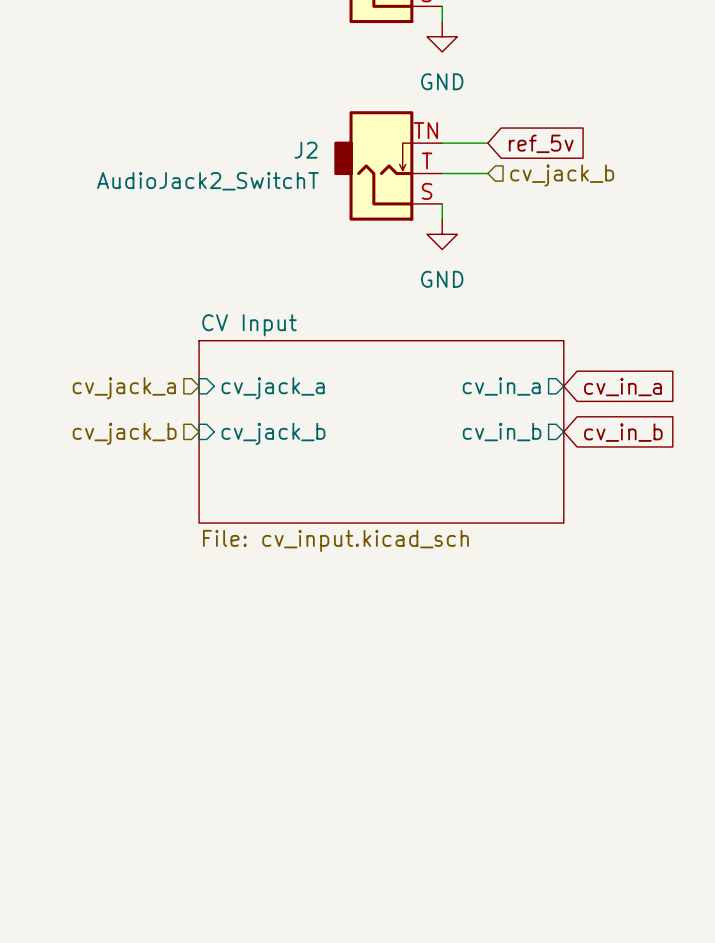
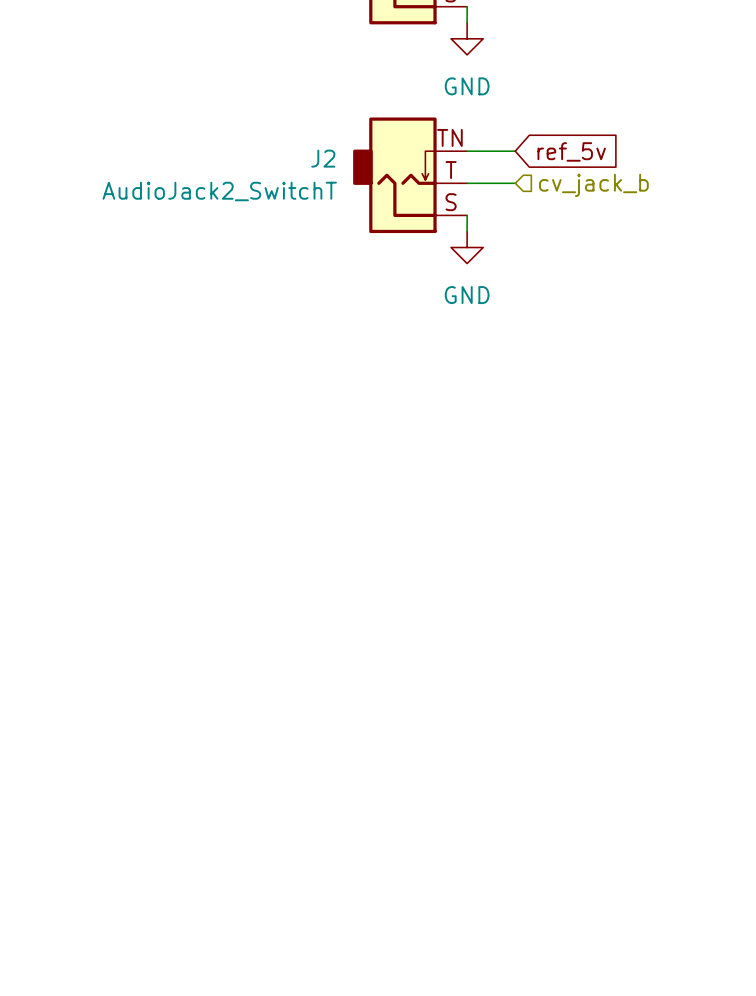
sheet pin: cv_in_a (501, 386) -> none
global label: cv_in_a (622, 387) -> none
hierarchical label: cv_jack_a (124, 388) -> none
sheet pin: cv_jack_a (273, 388) -> none
sheet CV Input: File: cv_input.kicad_sch (381, 431) -> none
sheet pin: cv_in_b (502, 432) -> none
global label: cv_in_b (623, 432) -> none
hierarchical label: cv_jack_b (124, 433) -> none
sheet pin: cv_jack_b (273, 433) -> none

